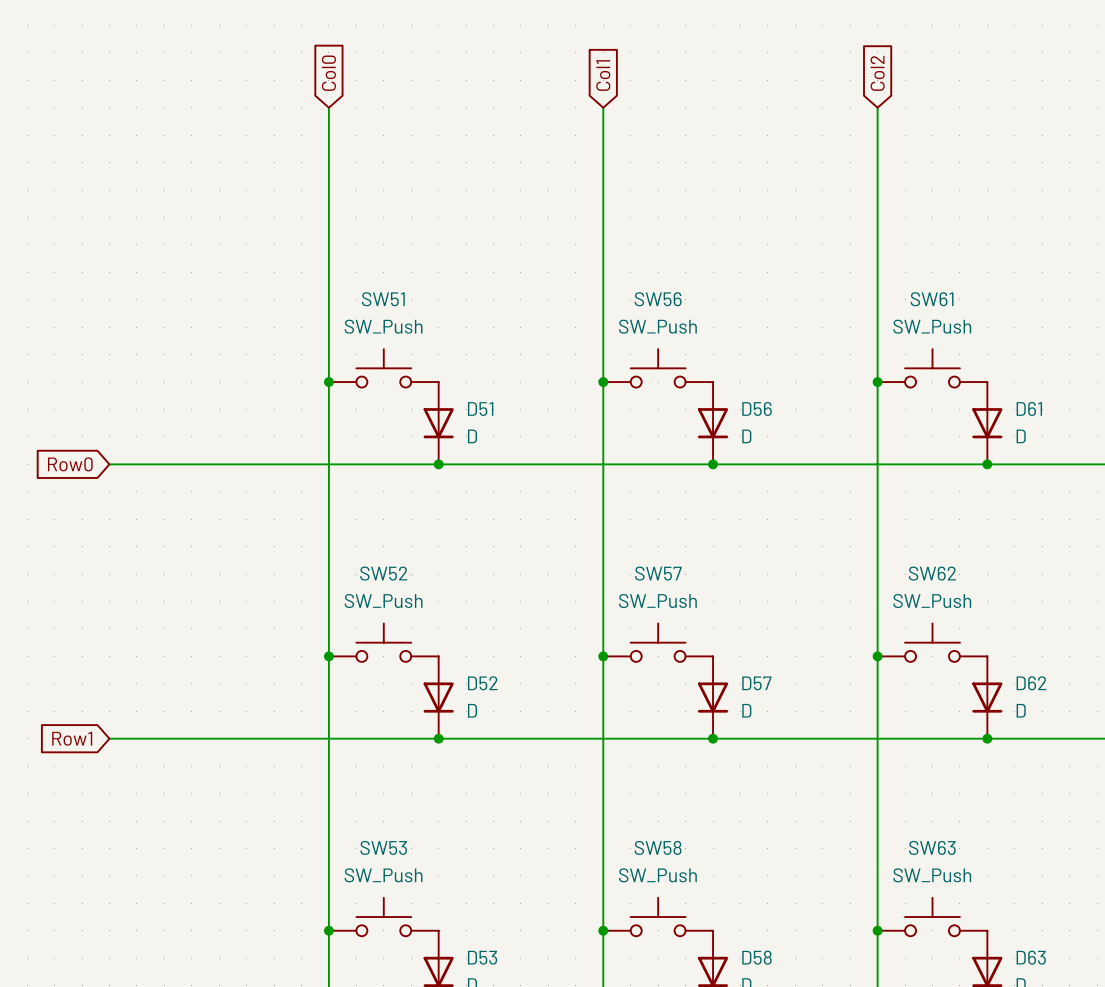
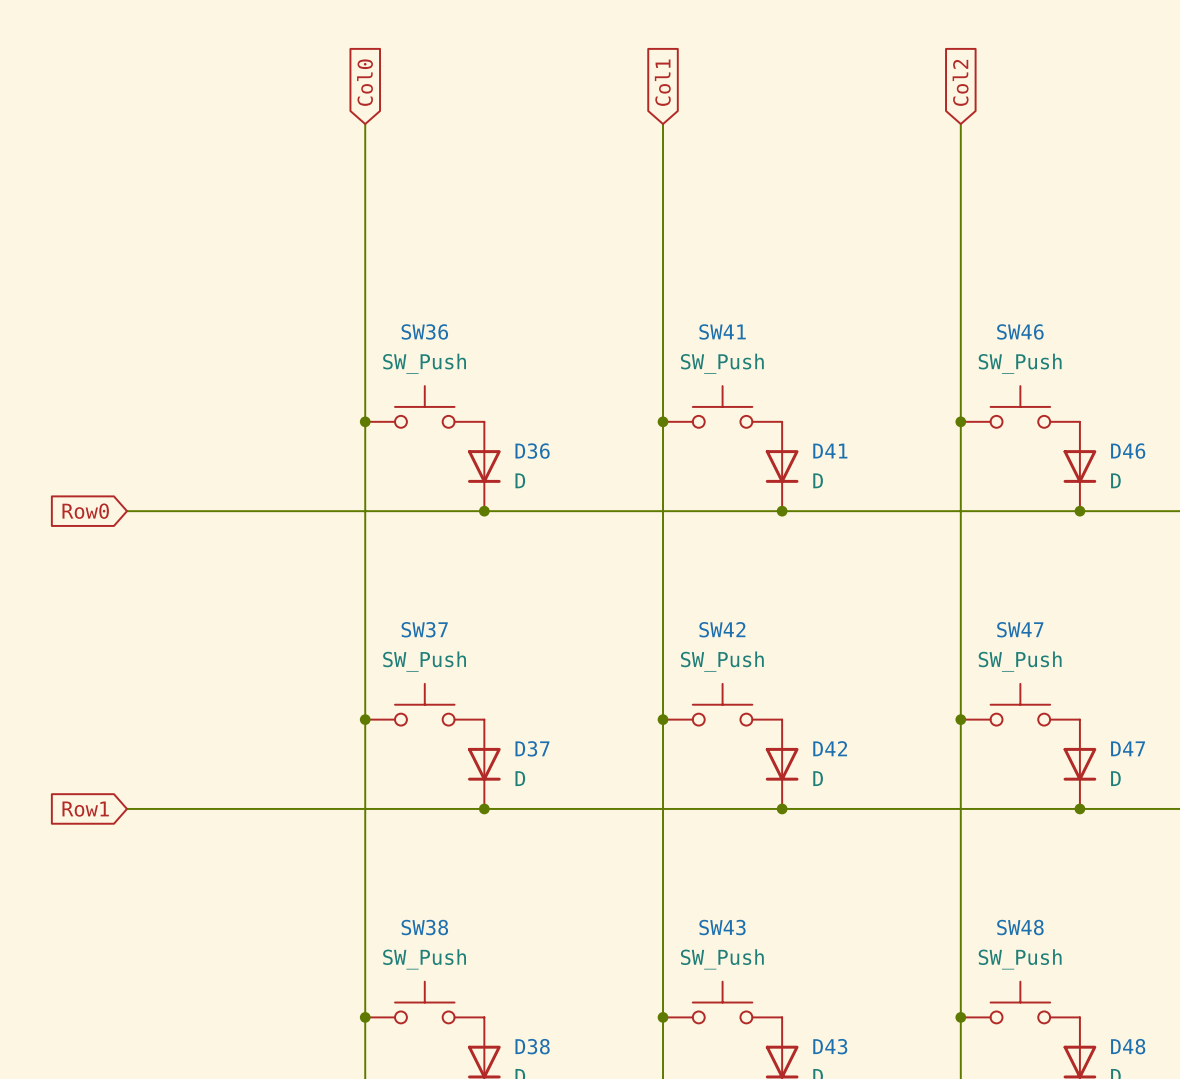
SW51 name: SW51 (383, 299) -> SW36 (424, 331)
SW56 name: SW56 (658, 299) -> SW41 (722, 331)
SW61 name: SW61 (932, 299) -> SW46 (1020, 331)
D56 name: D56 (757, 408) -> D41 (830, 451)
D61 name: D61 (1029, 408) -> D46 (1128, 451)
D51 name: D51 (480, 409) -> D36 (532, 451)
SW52 name: SW52 (383, 573) -> SW37 (424, 629)
SW57 name: SW57 (658, 573) -> SW42 (722, 629)
SW62 name: SW62 (932, 573) -> SW47 (1020, 629)
D52 name: D52 (482, 683) -> D37 (532, 748)
D57 name: D57 (756, 683) -> D42 (830, 748)
D62 name: D62 (1031, 683) -> D47 (1128, 748)
SW53 name: SW53 (383, 847) -> SW38 (424, 927)
SW58 name: SW58 (658, 847) -> SW43 (722, 927)
SW63 name: SW63 (932, 847) -> SW48 (1020, 927)
D53 name: D53 (482, 957) -> D38 (532, 1046)
D58 name: D58 (756, 957) -> D43 (830, 1046)
D63 name: D63 (1031, 957) -> D48 (1128, 1046)

